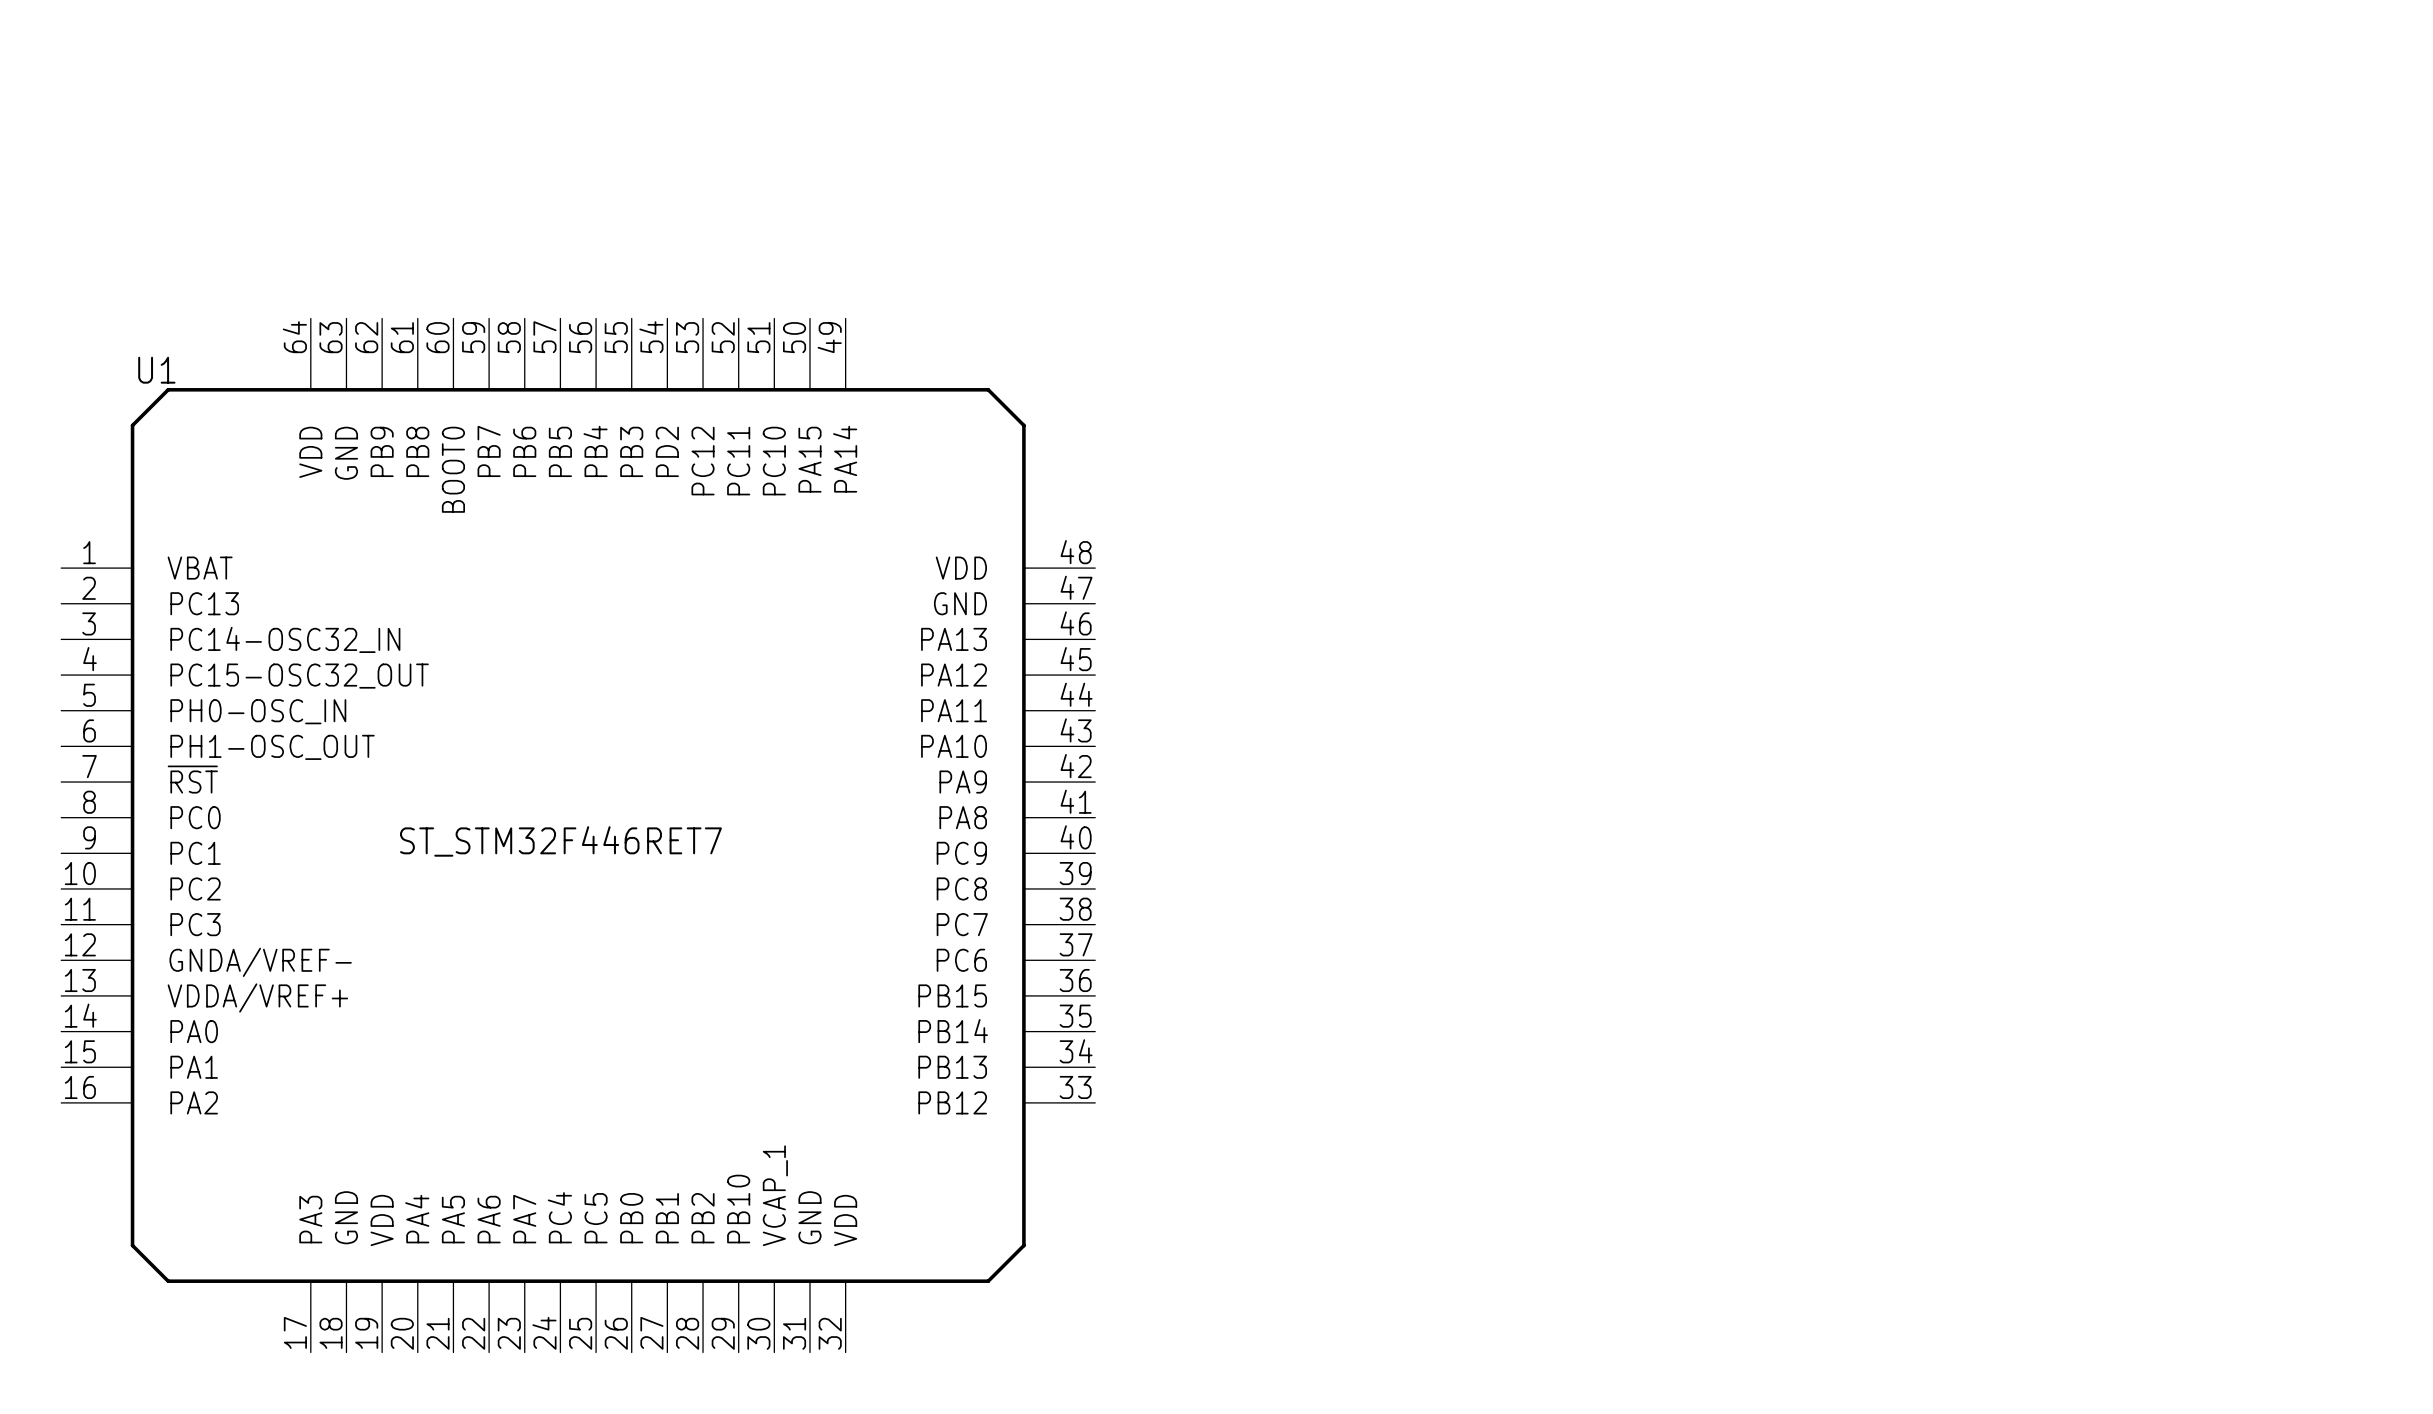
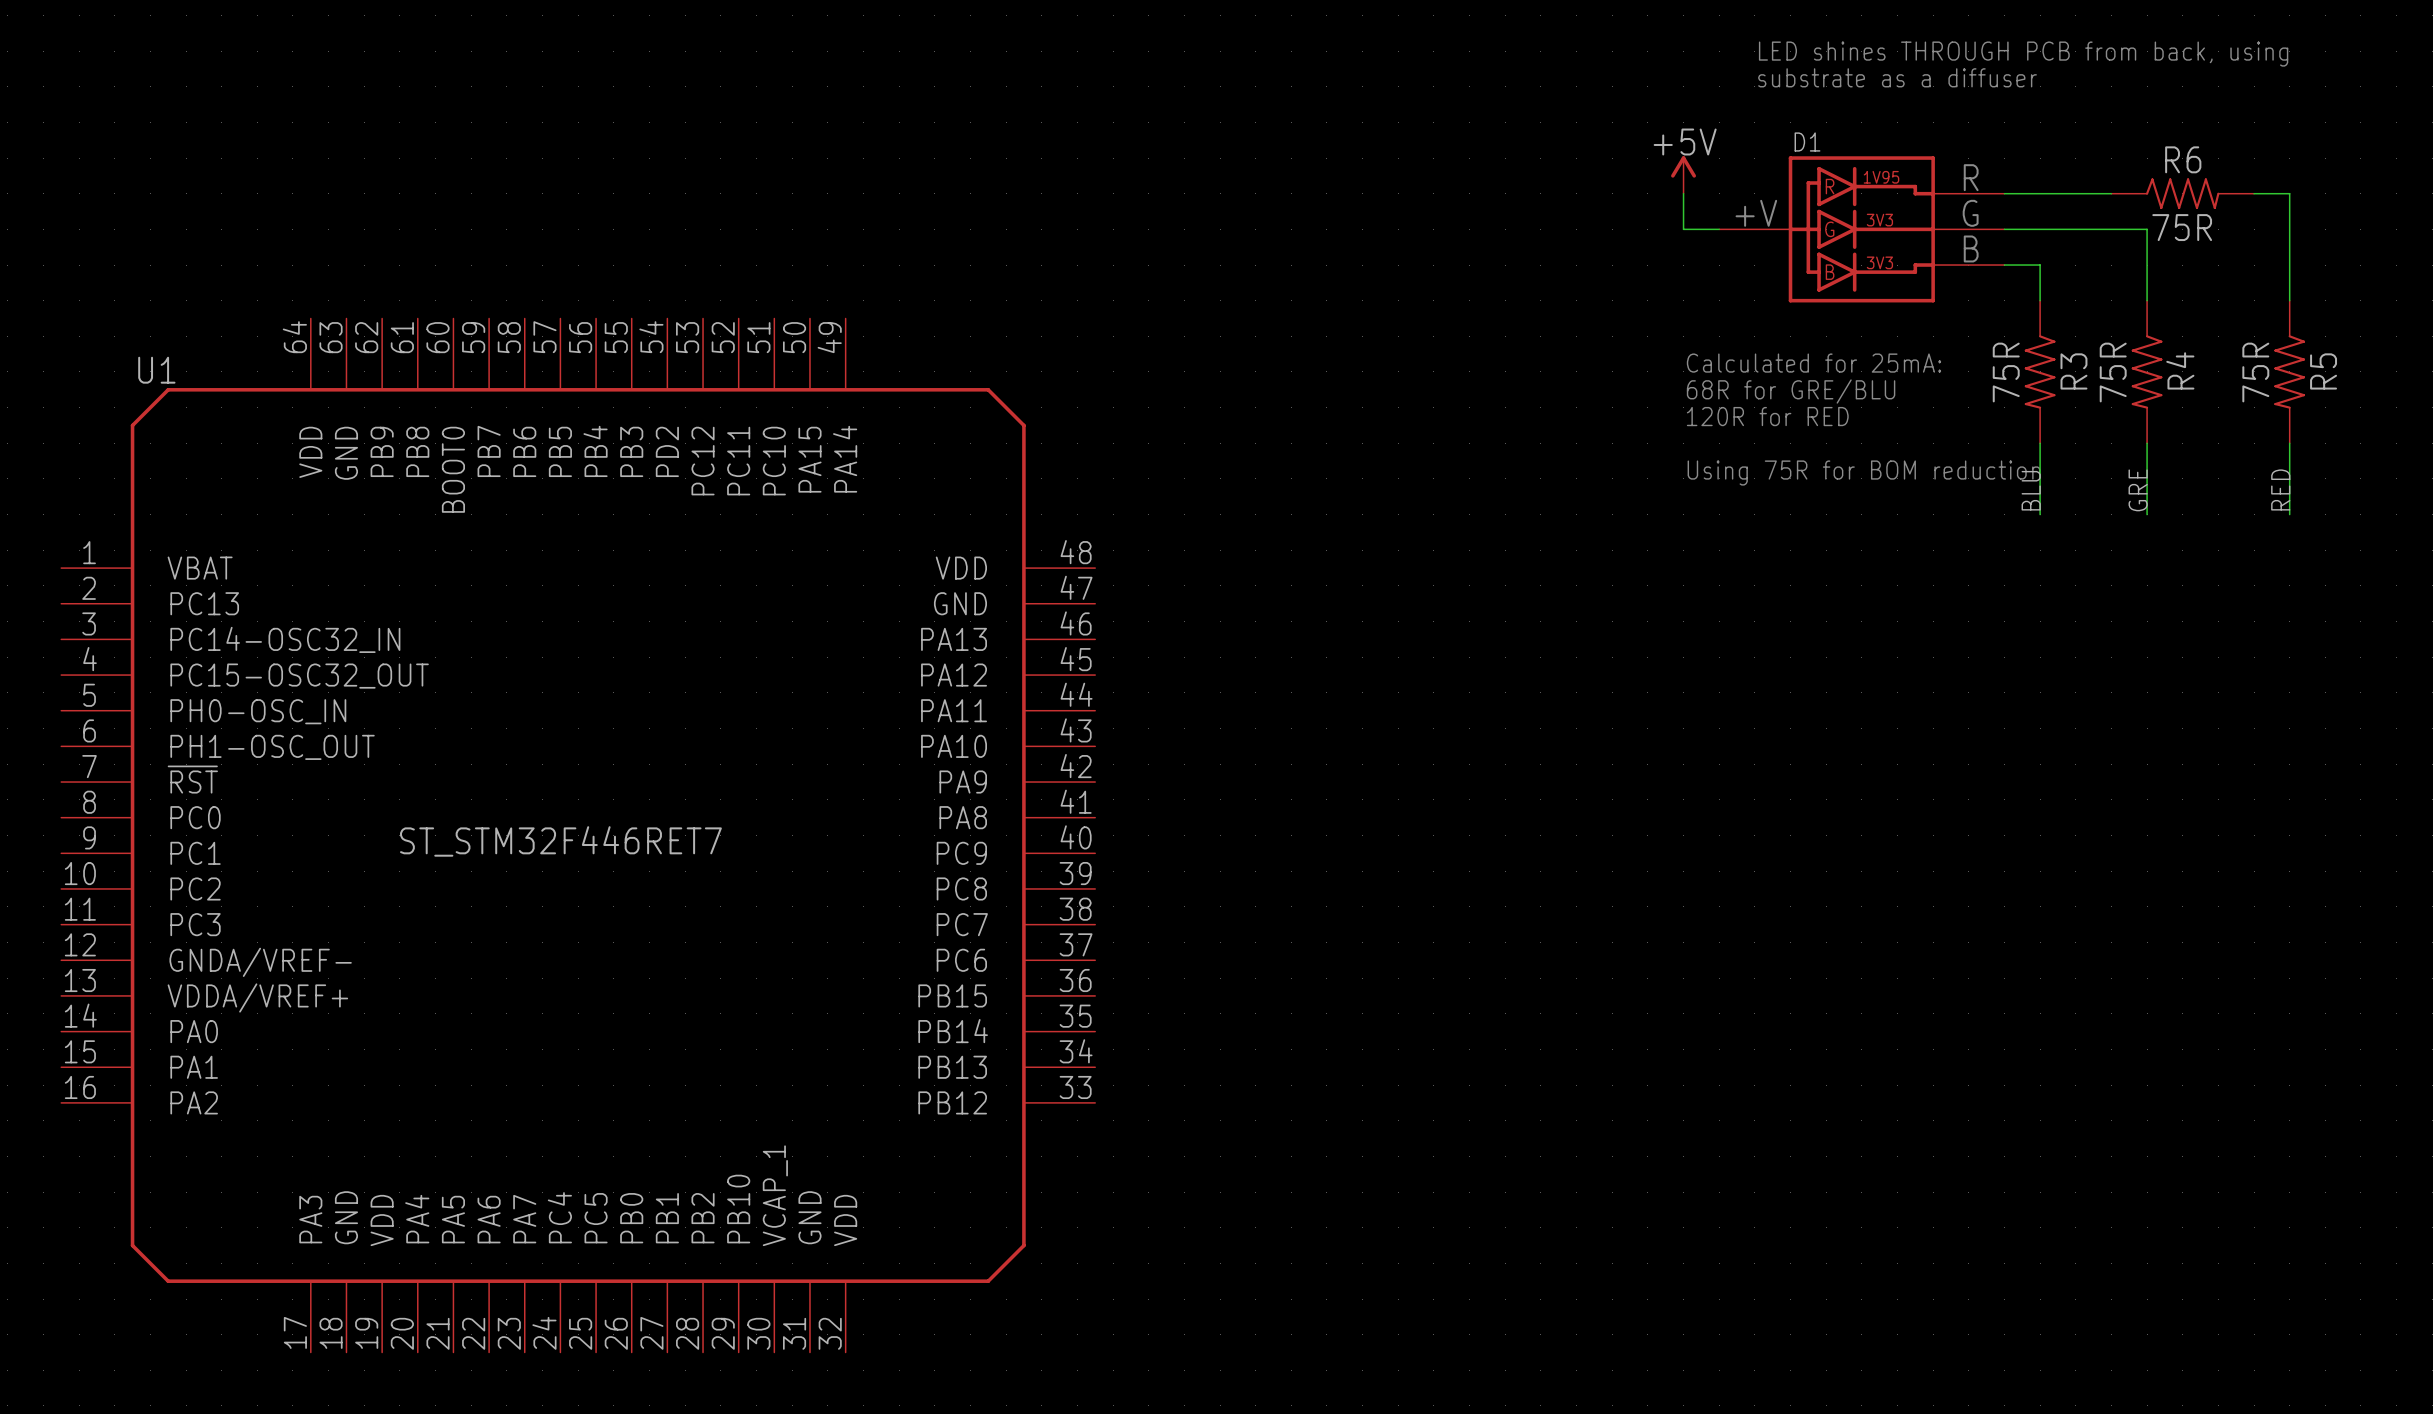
text: none -> LED shines THROUGH PCB from back, using (2023, 54)
text: none -> substrate as a diffuser (1897, 77)
power symbol: none -> +5V (1683, 174)
wire: none -> (1683, 193) (1683, 229) (1719, 229)
wire: none -> (2004, 193) (2111, 193)
R6: none -> (2182, 193)
wire: none -> (2254, 193) (2289, 193) (2289, 300)
D1: none -> (1861, 229)
wire: none -> (2004, 229) (2147, 229) (2147, 300)
wire: none -> (2004, 265) (2040, 265) (2040, 300)
text: none -> Calculated for 25mA: (1813, 363)
R3: none -> (2040, 371)
R4: none -> (2147, 371)
R5: none -> (2289, 371)
text: none -> 68R for GRE/BLU (1791, 391)
text: none -> 120R for RED (1767, 416)
wire: none -> (2040, 443) (2040, 514)
wire: none -> (2147, 443) (2147, 514)
wire: none -> (2289, 443) (2289, 514)
text: none -> Using 75R for BOM reduction (1864, 473)
label: none -> RED (2280, 489)
label: none -> BLU (2031, 490)
label: none -> GRE (2138, 490)

